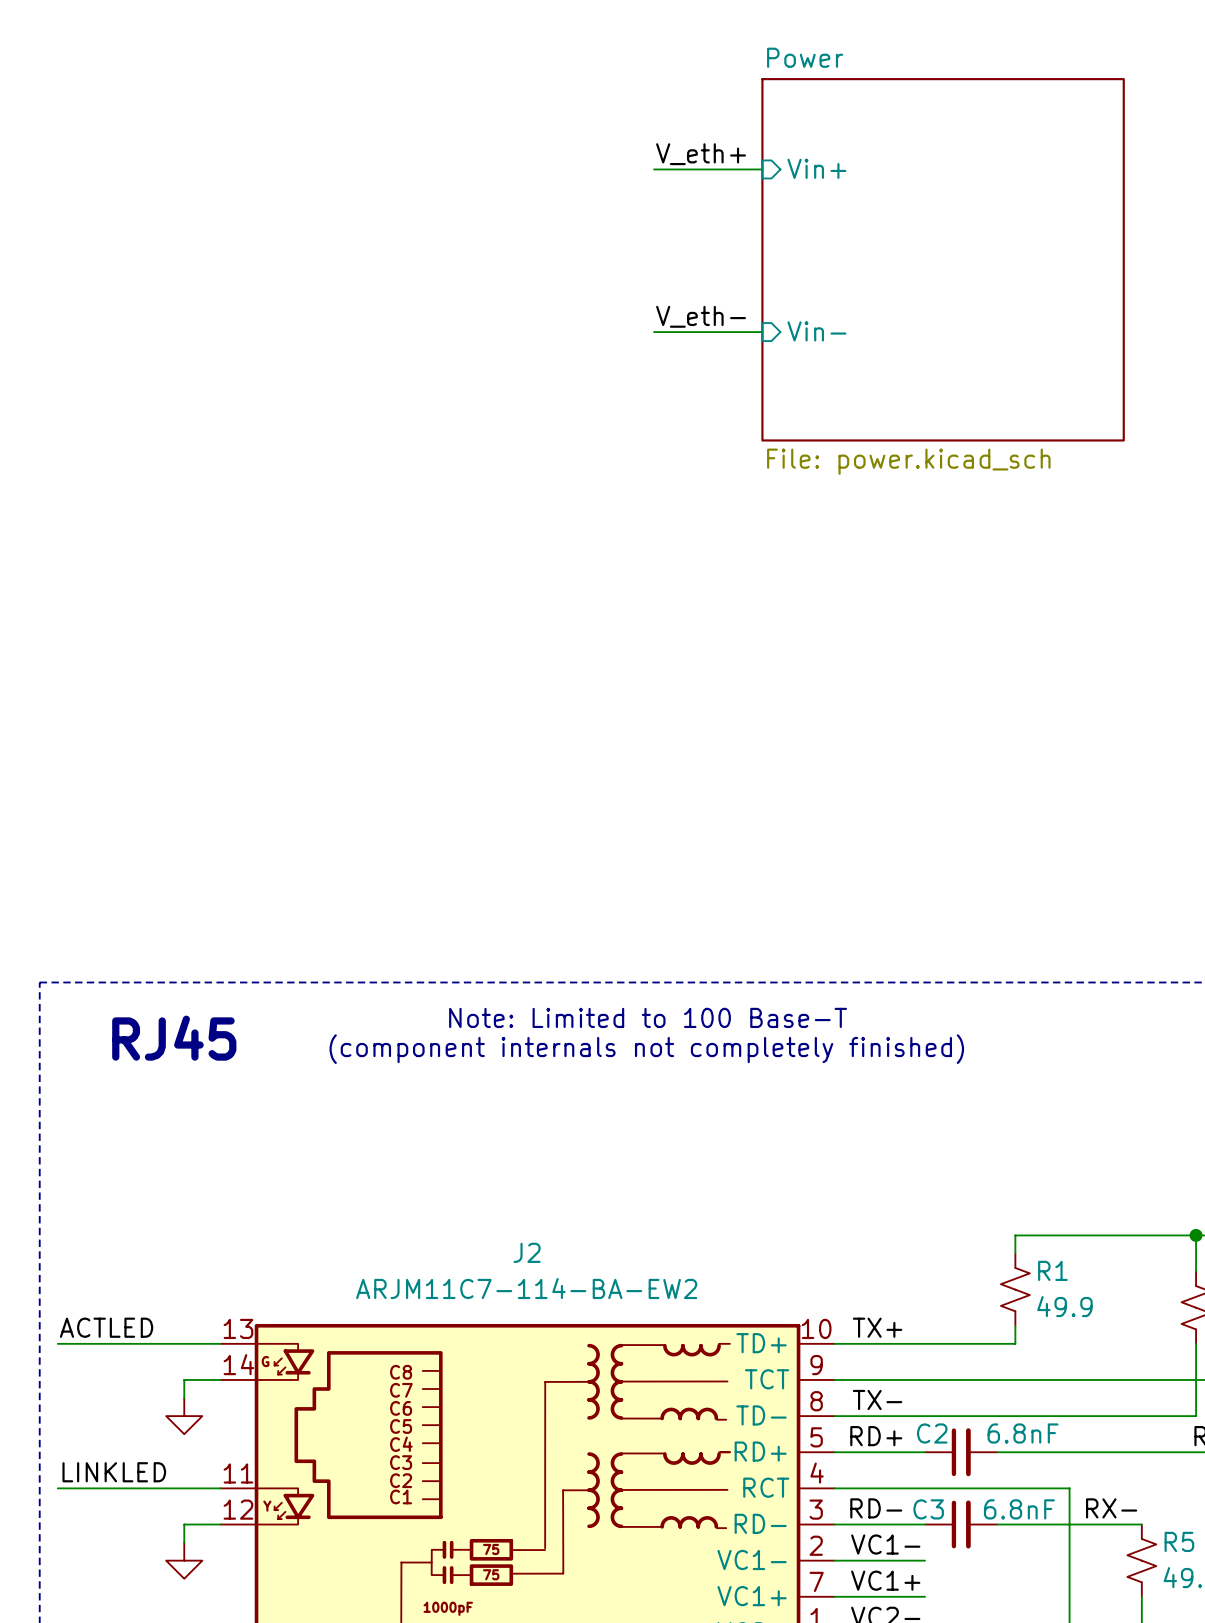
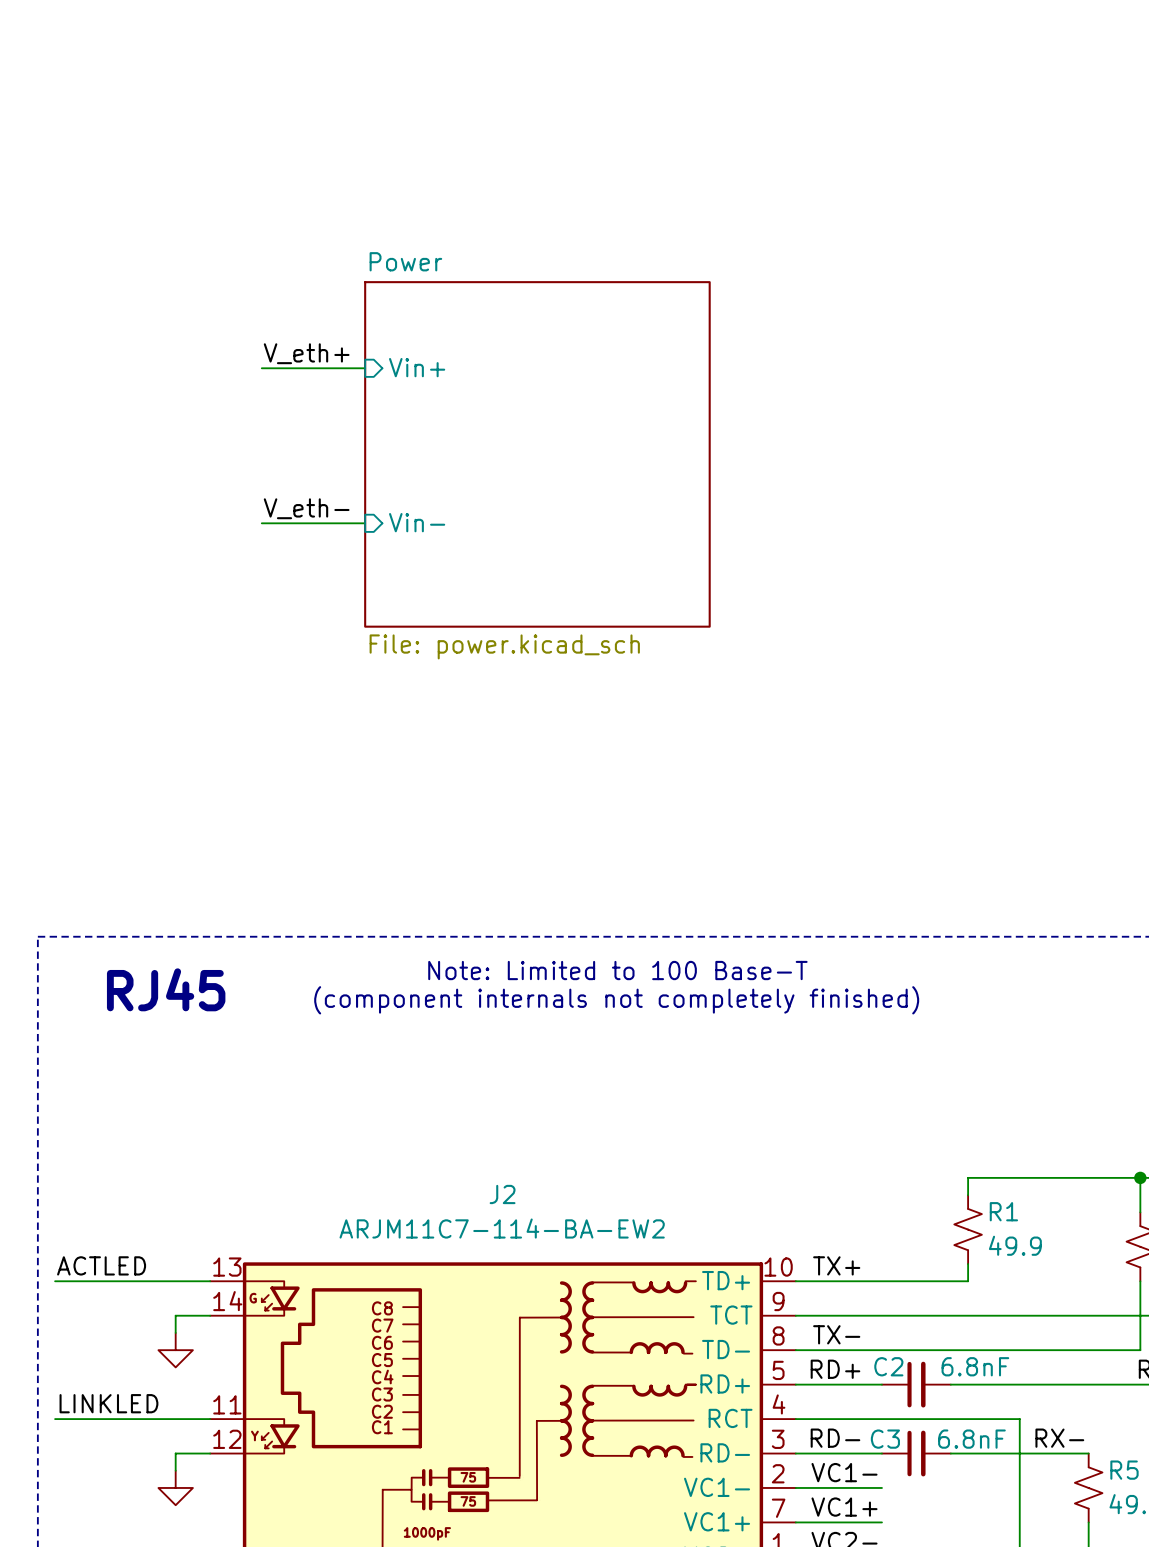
label: V_eth+ (701, 154) -> none
sheet pin: Vin+ (816, 168) -> none
wire: (654, 169) (762, 169) -> none
sheet Power: File: power.kicad_sch (943, 259) -> none
label: V_eth- (701, 316) -> none
sheet pin: Vin- (816, 331) -> none
wire: (654, 332) (762, 332) -> none
label: none -> V_eth+ (306, 353)
sheet pin: none -> Vin+ (417, 367)
wire: none -> (261, 368) (365, 368)
sheet Power: none -> File: power.kicad_sch (537, 454)
label: none -> V_eth- (306, 508)
wire: none -> (261, 523) (365, 523)
sheet pin: none -> Vin- (417, 522)

